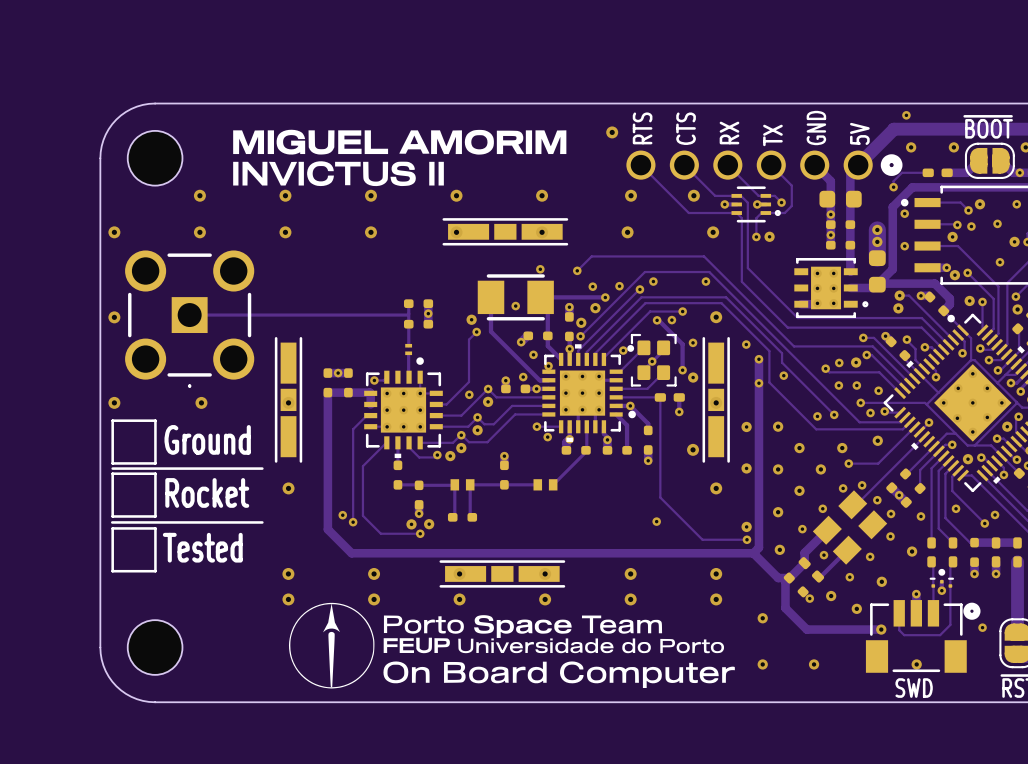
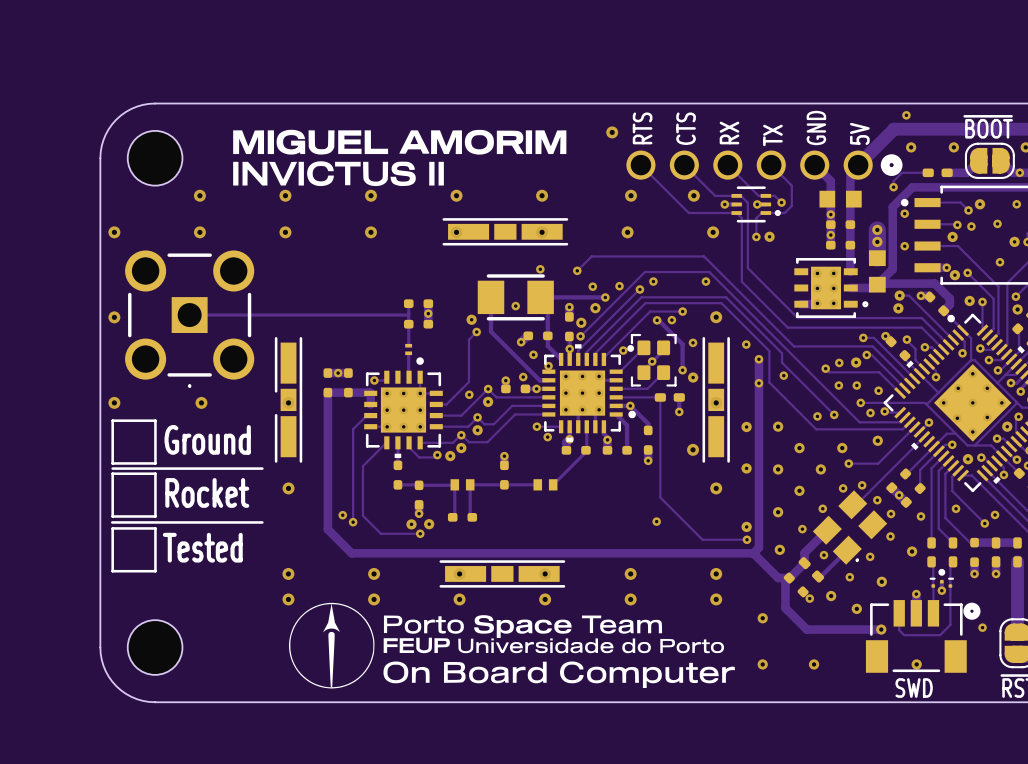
part footprint: [819, 190, 862, 208] -> [819, 190, 862, 208]
part footprint: [868, 250, 886, 293] -> [868, 250, 886, 293]
part footprint: [274, 337, 303, 463] -> [274, 337, 303, 463]
part footprint: [812, 490, 888, 565] -> [812, 490, 888, 565]

